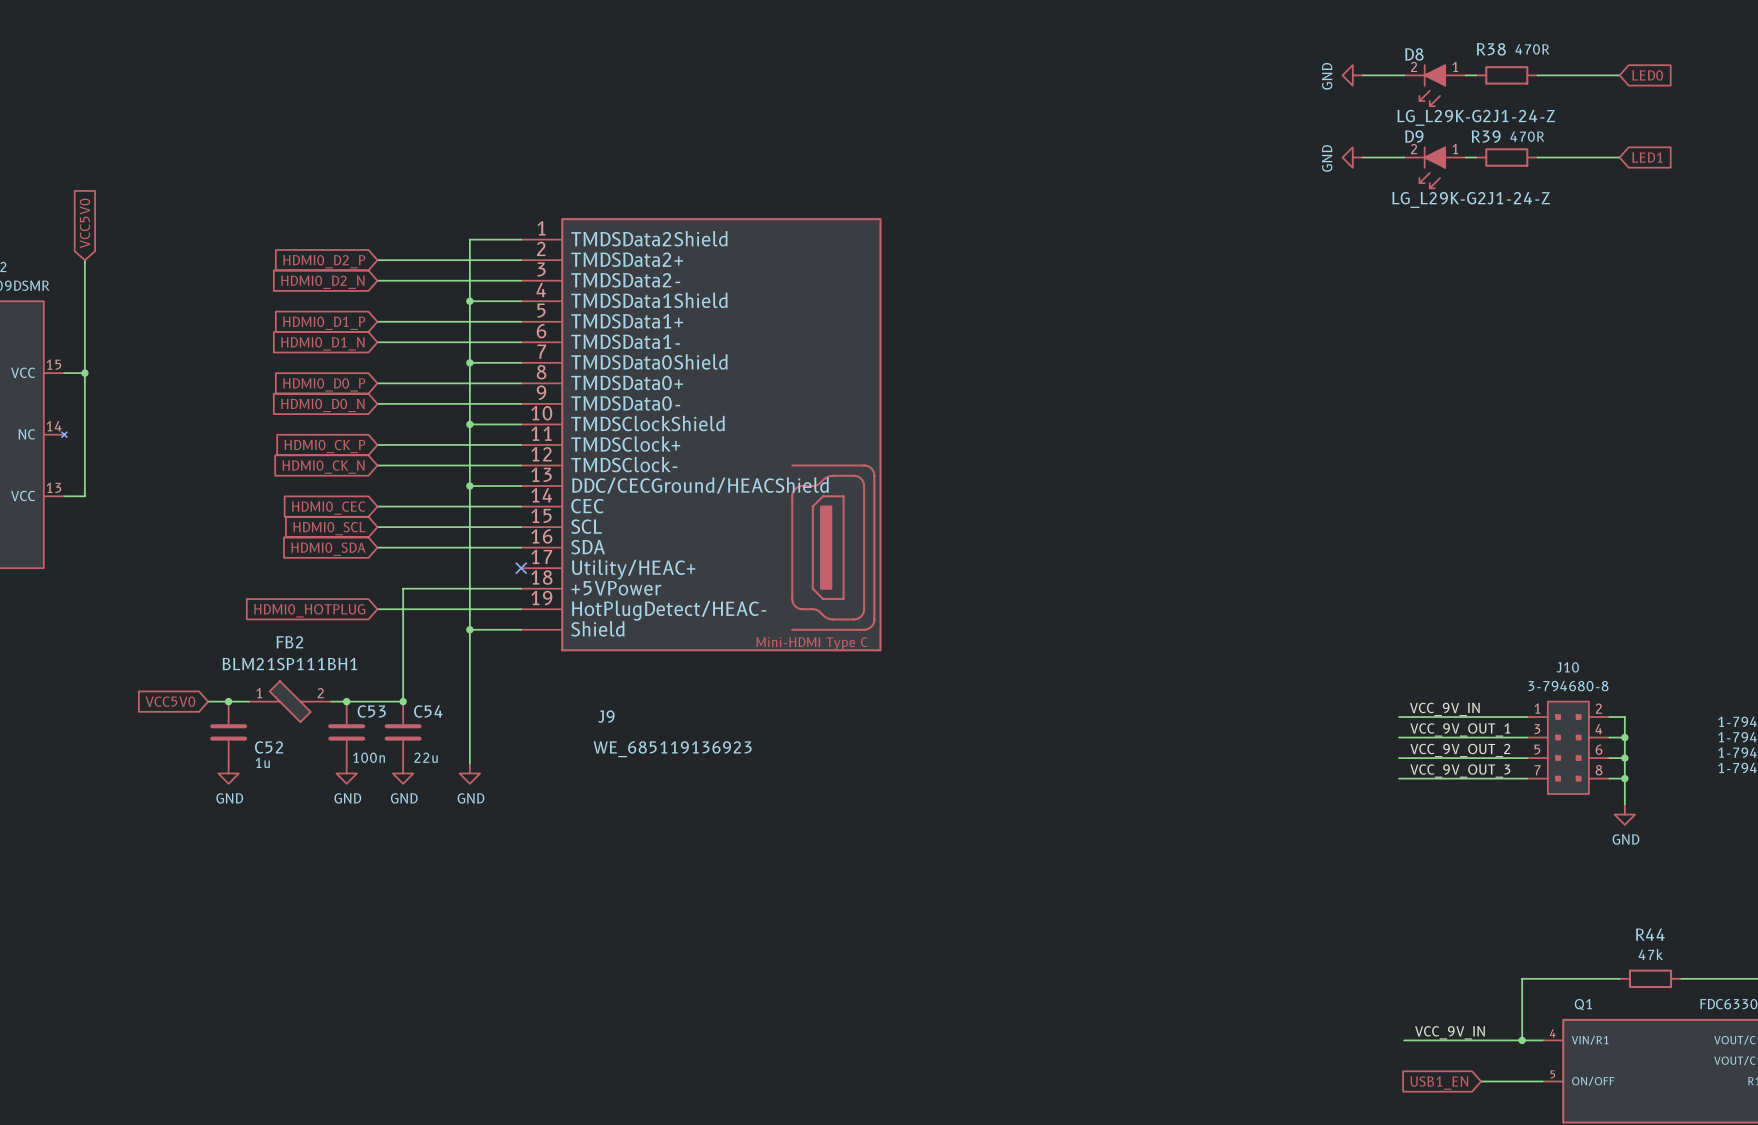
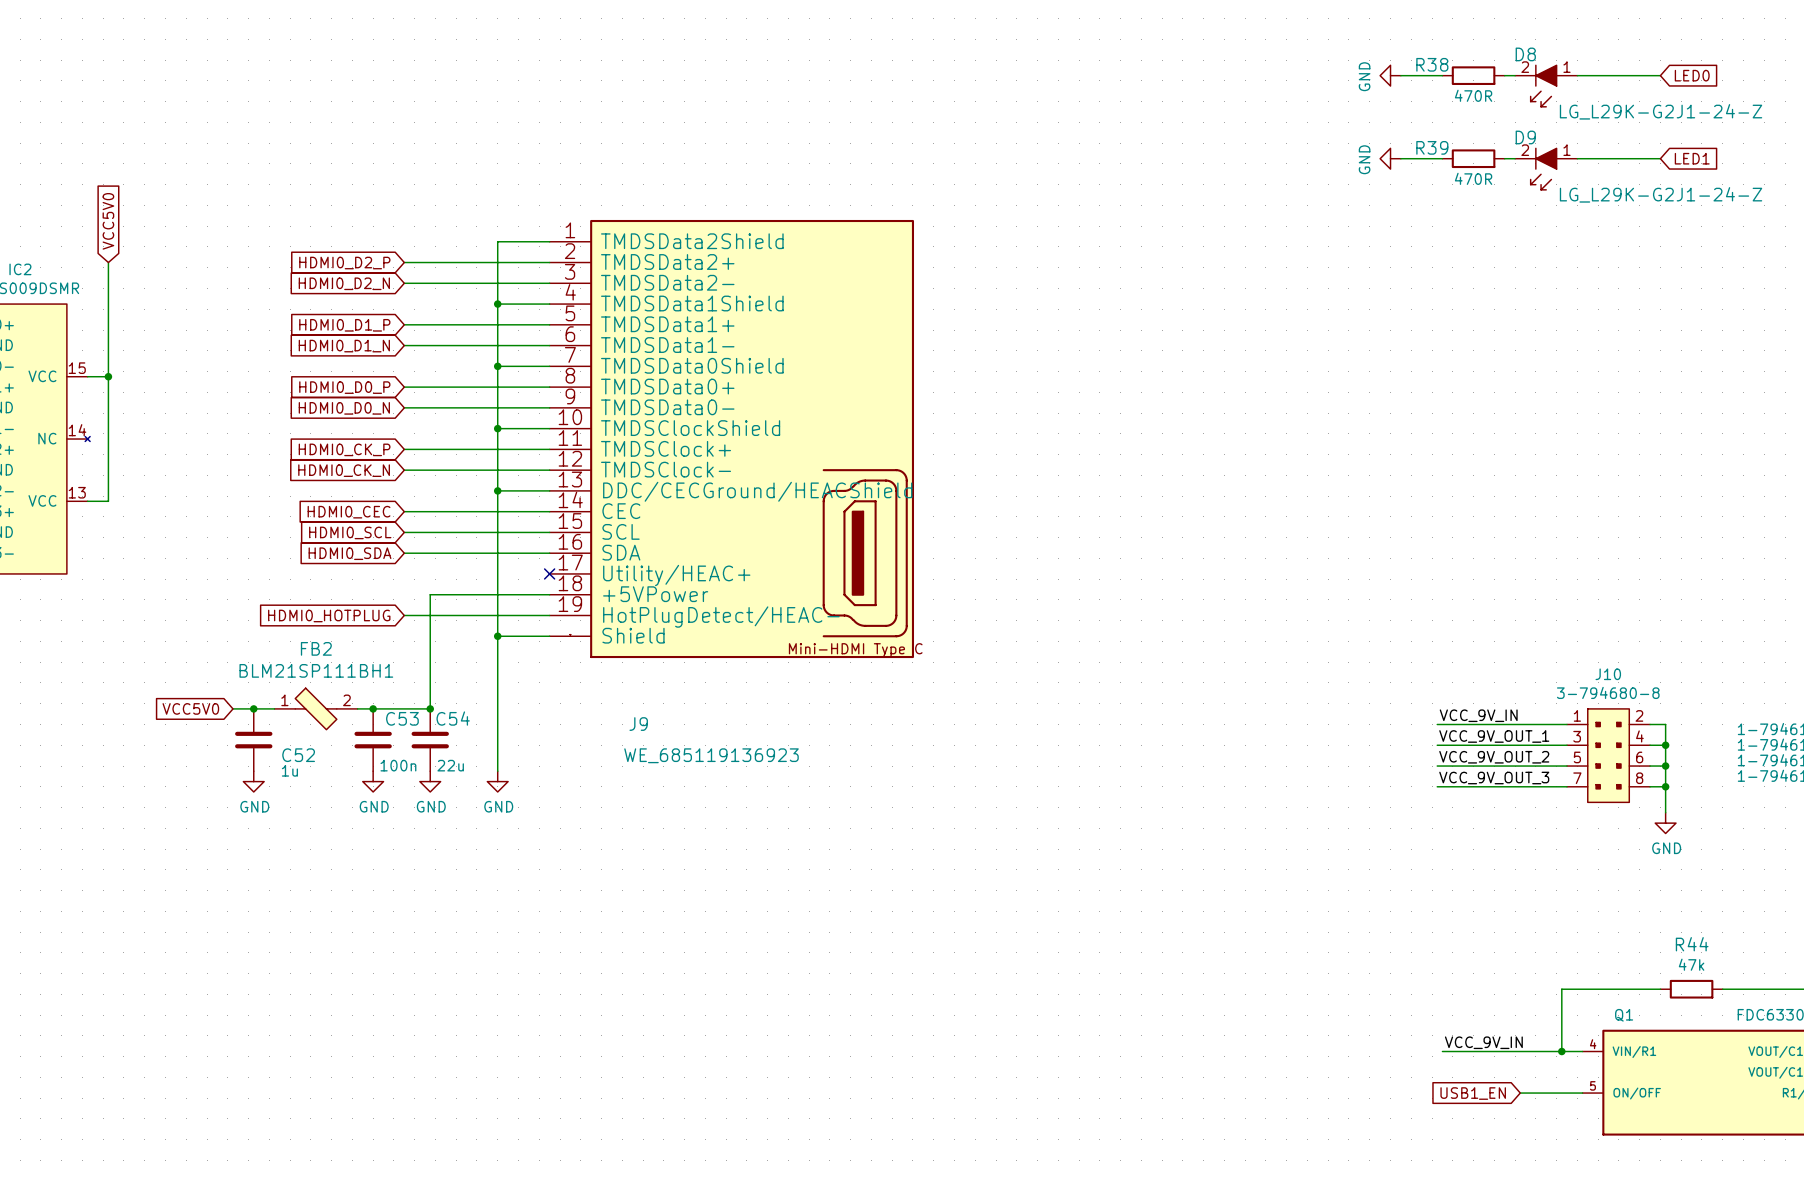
R38 name position: R38 (1491, 49) -> R38 (1432, 64)
R38 text position: 470R (1532, 49) -> 470R (1473, 95)
R38 position: (1506, 75) -> (1473, 75)
D8 position: (1434, 85) -> (1546, 86)
D8 value position: LG_L29K-G2J1-24-Z (1476, 117) -> LG_L29K-G2J1-24-Z (1661, 111)
R39 name position: R39 (1486, 136) -> R39 (1432, 147)
R39 text position: 470R (1527, 136) -> 470R (1473, 178)
R39 position: (1506, 157) -> (1473, 158)
D9 position: (1434, 167) -> (1546, 169)
D9 value position: LG_L29K-G2J1-24-Z (1471, 199) -> LG_L29K-G2J1-24-Z (1661, 194)

